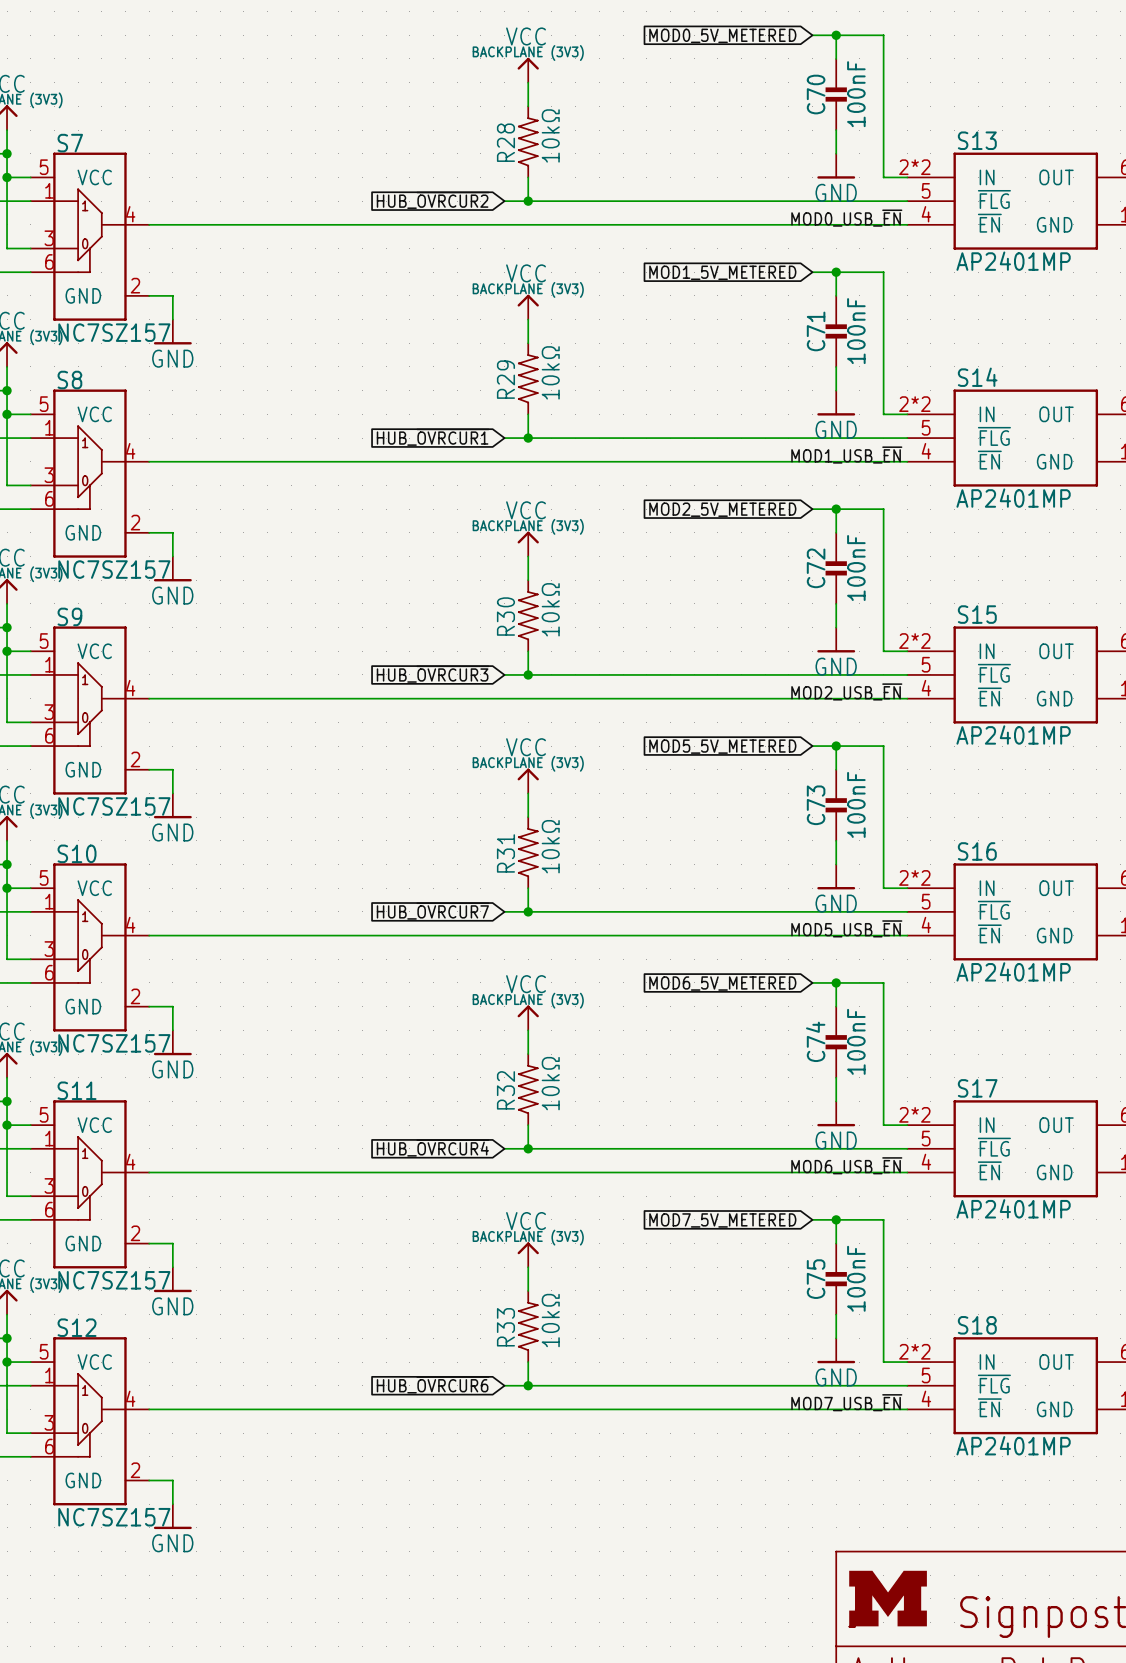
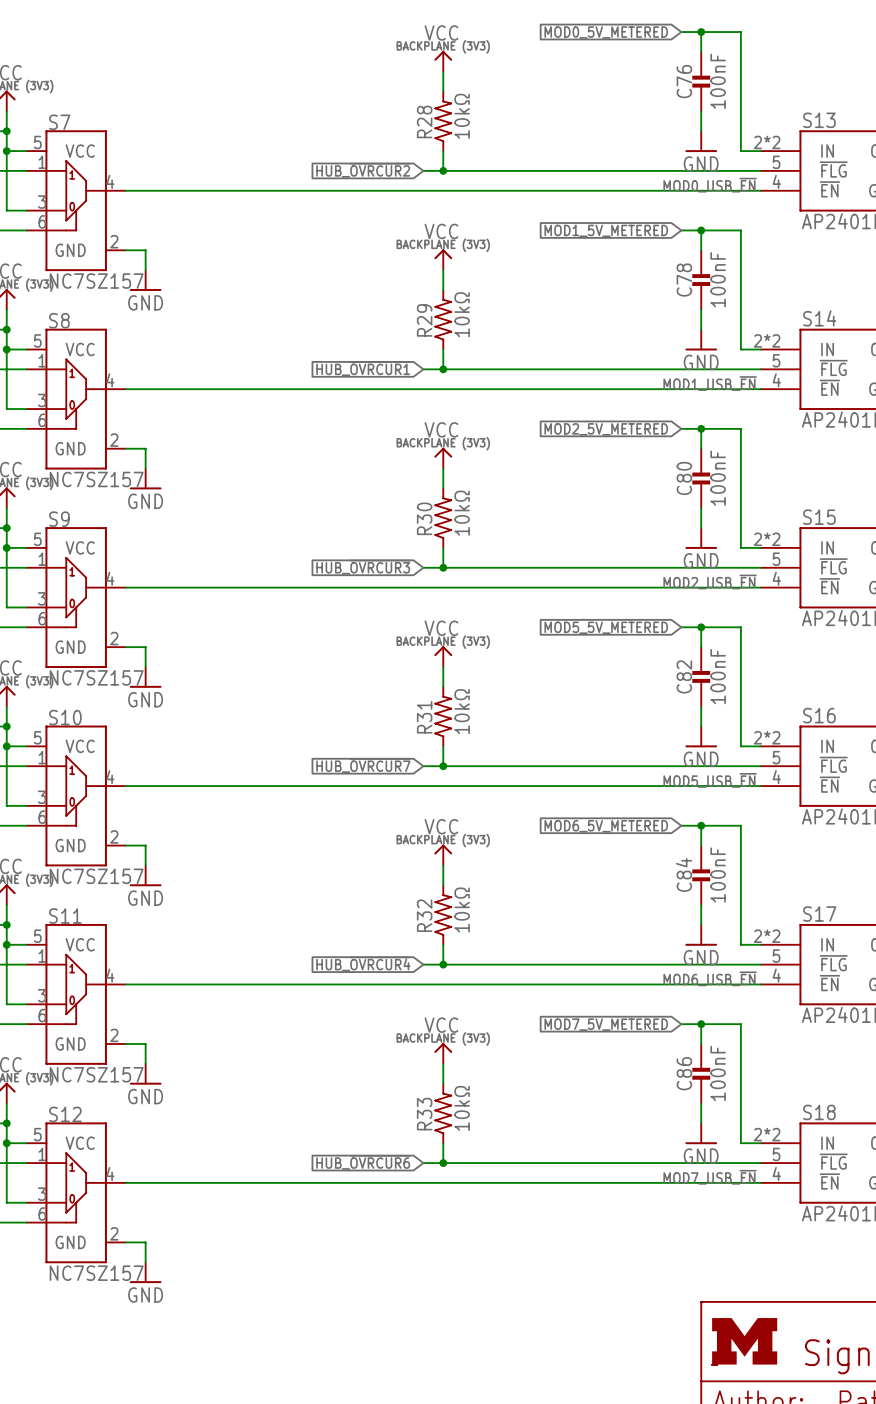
C70 name: C70 (816, 94) -> C76 (684, 81)
C71 name: C71 (816, 331) -> C78 (684, 280)
C72 name: C72 (816, 568) -> C80 (684, 478)
C73 name: C73 (816, 805) -> C82 (684, 676)
C74 name: C74 (815, 1041) -> C84 (684, 875)
C75 name: C75 (816, 1279) -> C86 (684, 1073)

